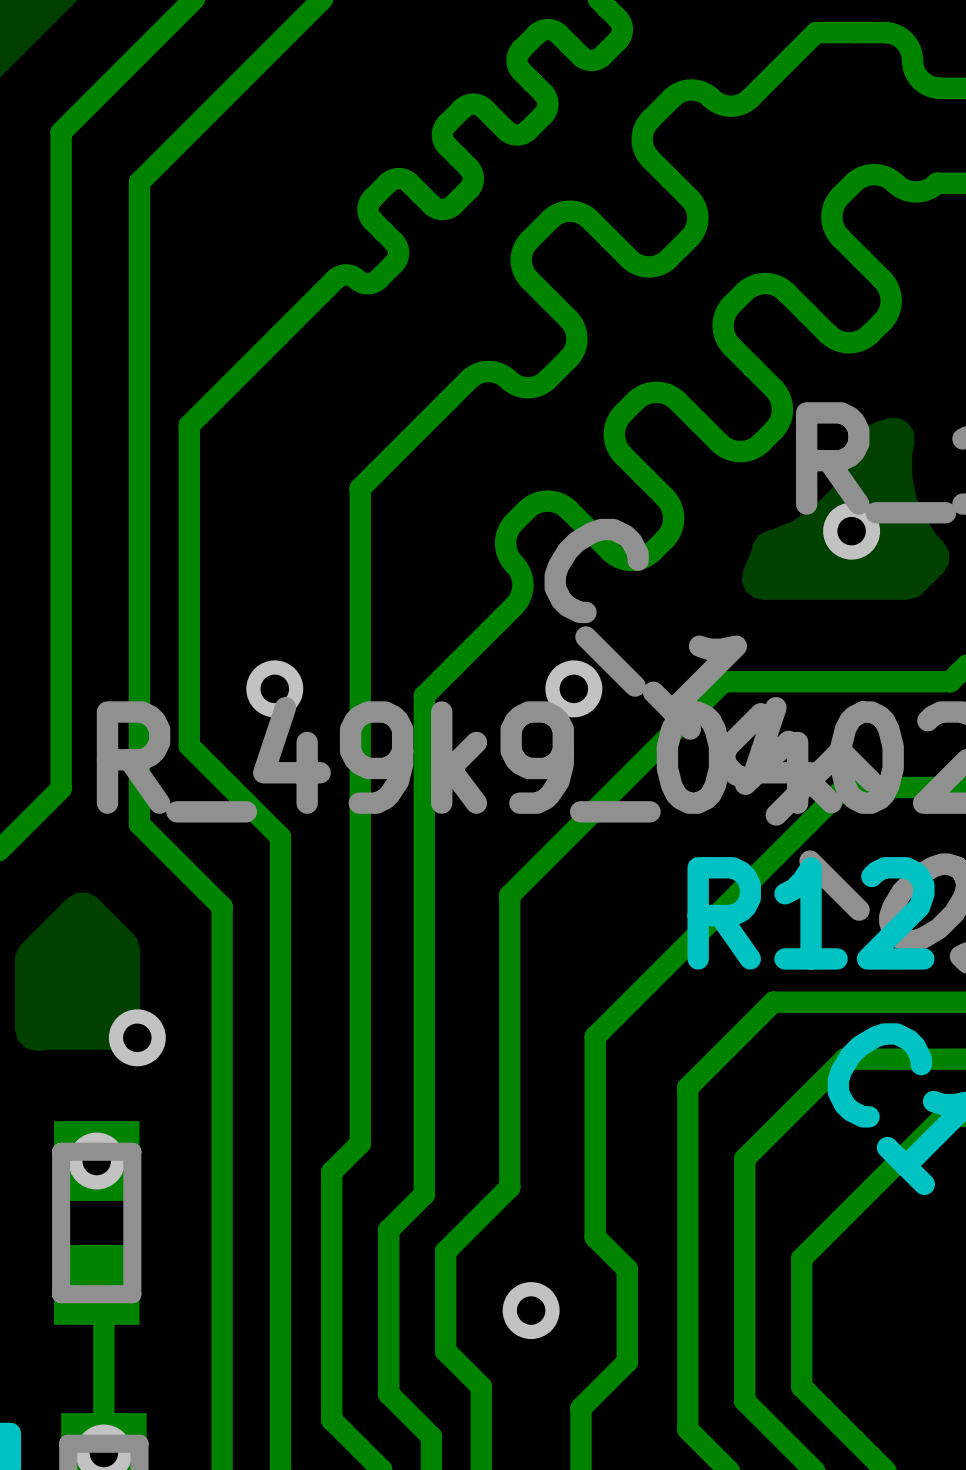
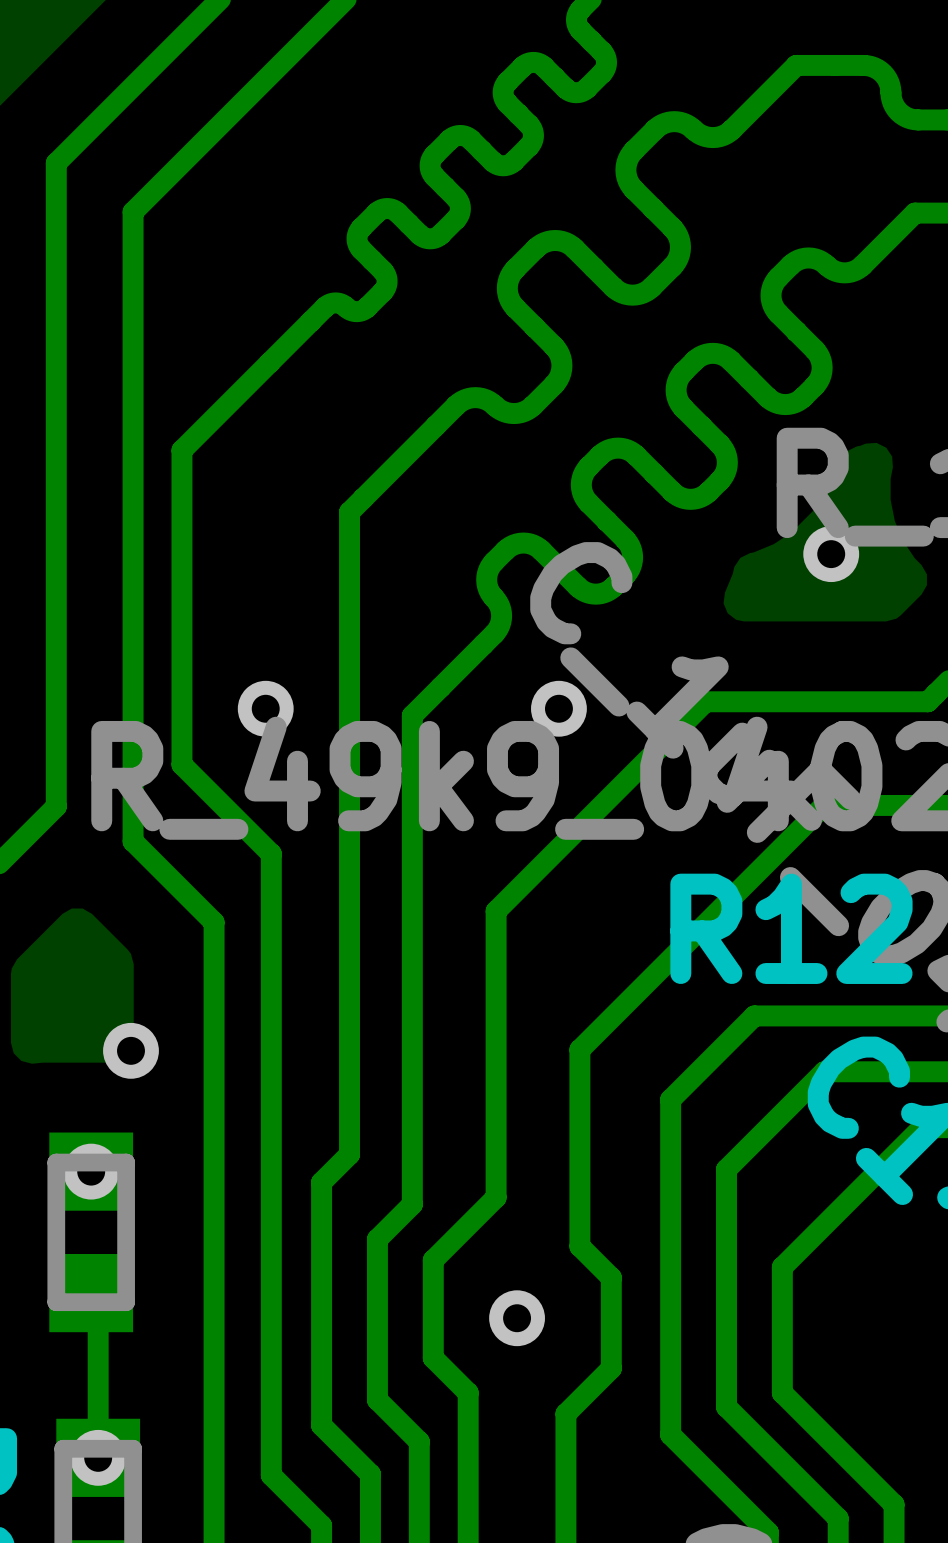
track: (937, 183) (925, 190) (912, 191) (903, 189) (885, 176) (874, 174) (866, 175) (853, 183) (834, 204) (831, 216) (836, 232) (882, 279) (890, 293) (890, 304) (887, 315) (863, 338) (849, 342) (834, 338) (786, 292) (772, 284) (761, 283) (750, 287) (727, 309) (723, 325) (727, 341) (773, 388) (781, 401) (782, 413) (778, 424) (758, 445) (744, 451) (736, 451) (725, 447) (677, 400) (664, 393) (652, 392) (641, 396) (620, 416) (616, 423) (614, 434) (618, 449) (664, 497) (672, 510) (673, 518) (671, 529) (652, 551) (646, 556) (635, 560) (620, 558) (610, 551) (562, 505) (551, 501) (536, 503) (514, 522) (506, 535) (506, 550) (520, 572) (522, 585) (518, 600) (507, 612) -> (914, 213) (855, 270) (838, 272) (818, 259) (805, 258) (793, 263) (774, 282) (771, 295) (774, 308) (814, 349) (821, 361) (821, 371) (818, 380) (801, 399) (785, 404) (772, 401) (730, 360) (719, 354) (709, 353) (700, 356) (681, 374) (676, 387) (678, 401) (722, 447) (726, 455) (727, 465) (723, 475) (706, 494) (693, 499) (677, 495) (636, 455) (627, 450) (611, 448) (599, 455) (584, 472) (581, 481) (582, 491) (588, 502) (628, 543) (632, 557) (628, 571) (609, 590) (601, 593) (590, 593) (579, 588) (536, 546) (526, 543) (513, 544) (494, 561) (487, 573) (488, 589) (499, 604) (501, 613) (500, 624) (494, 633)

